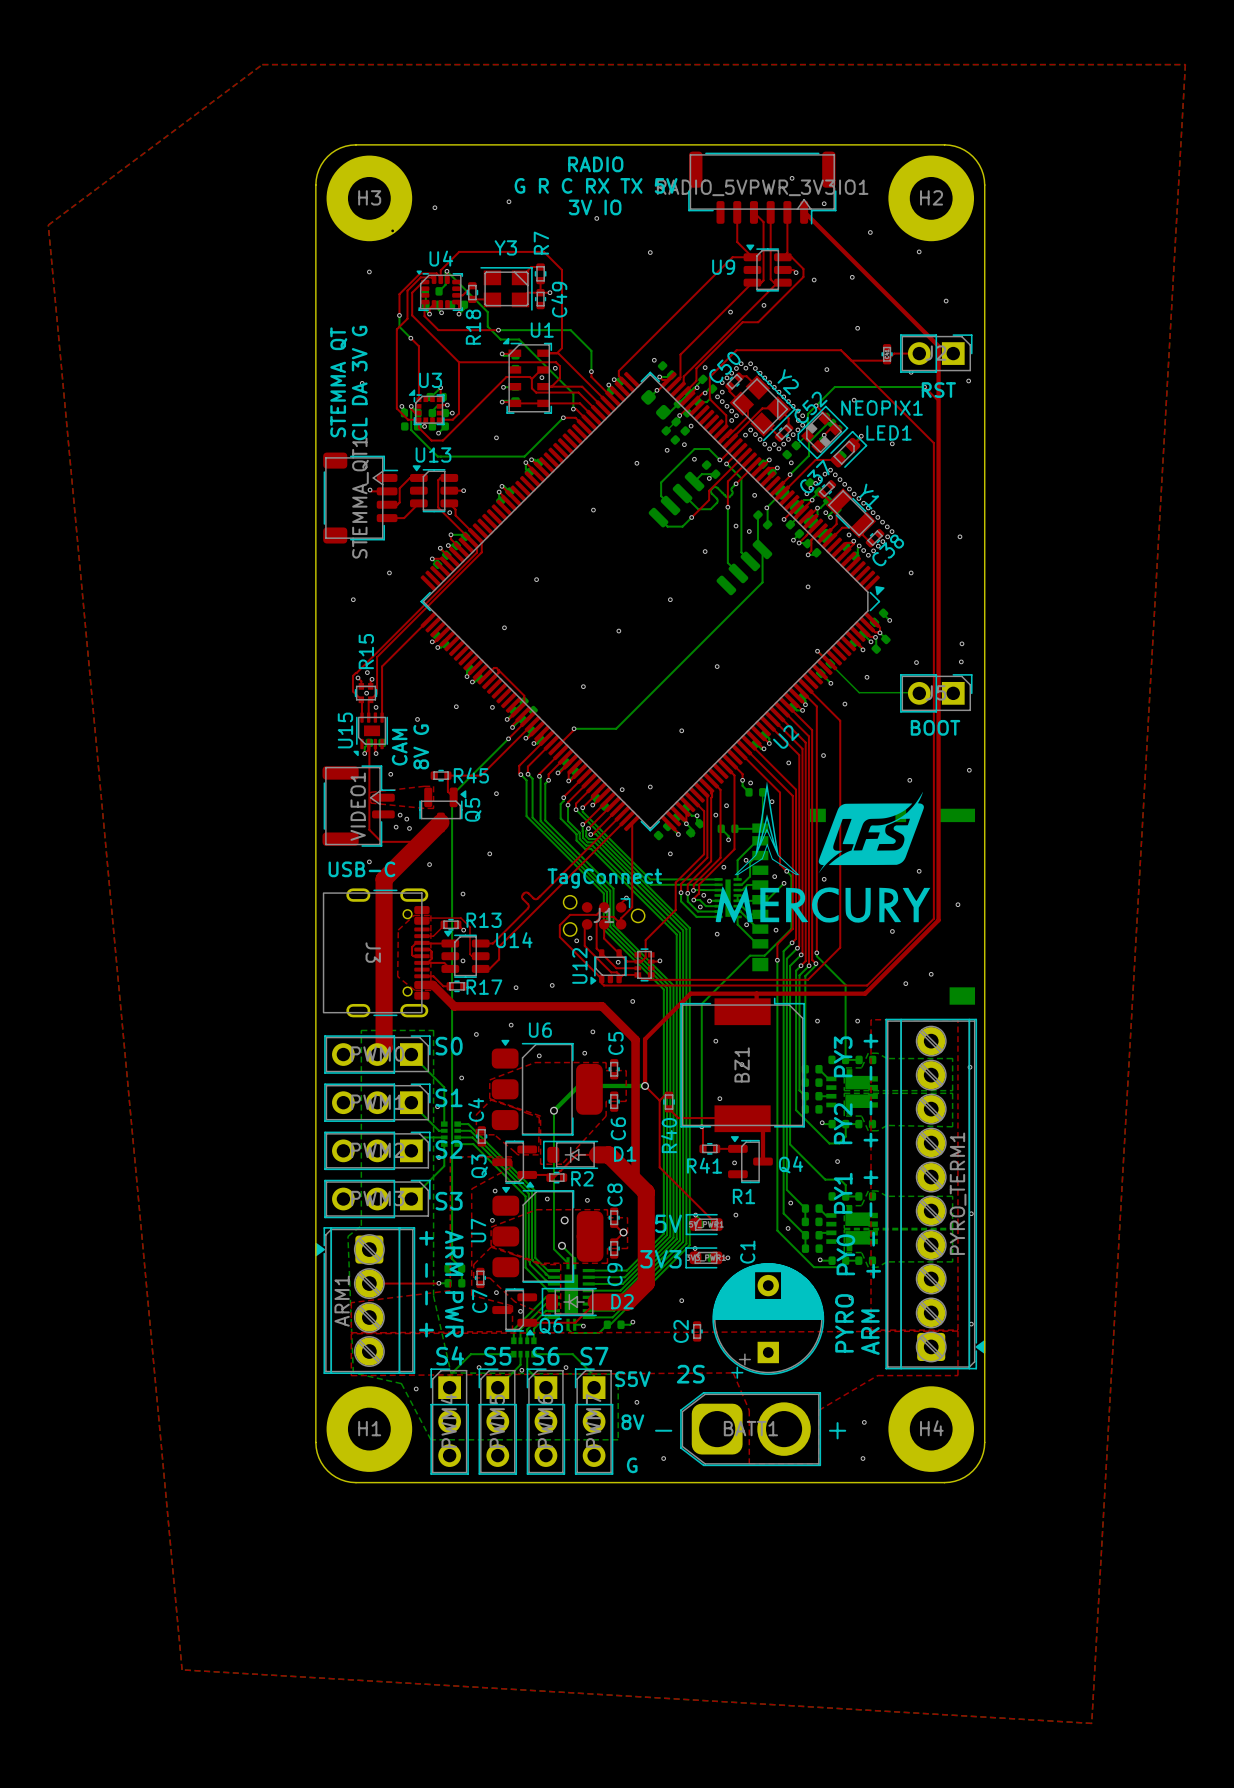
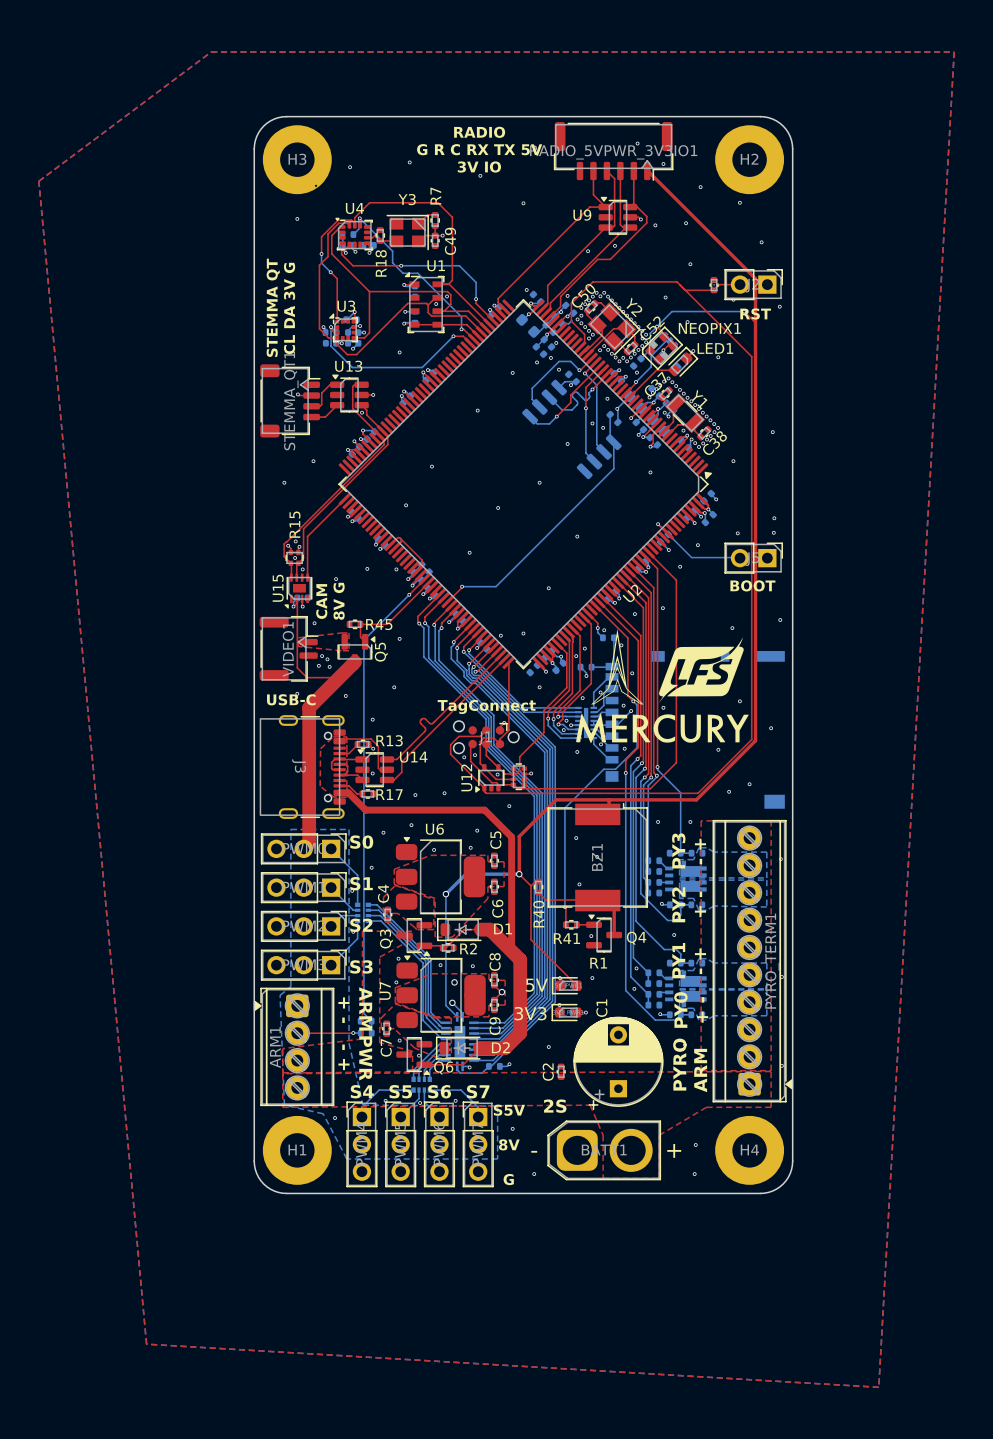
via: none -> (632, 673)

